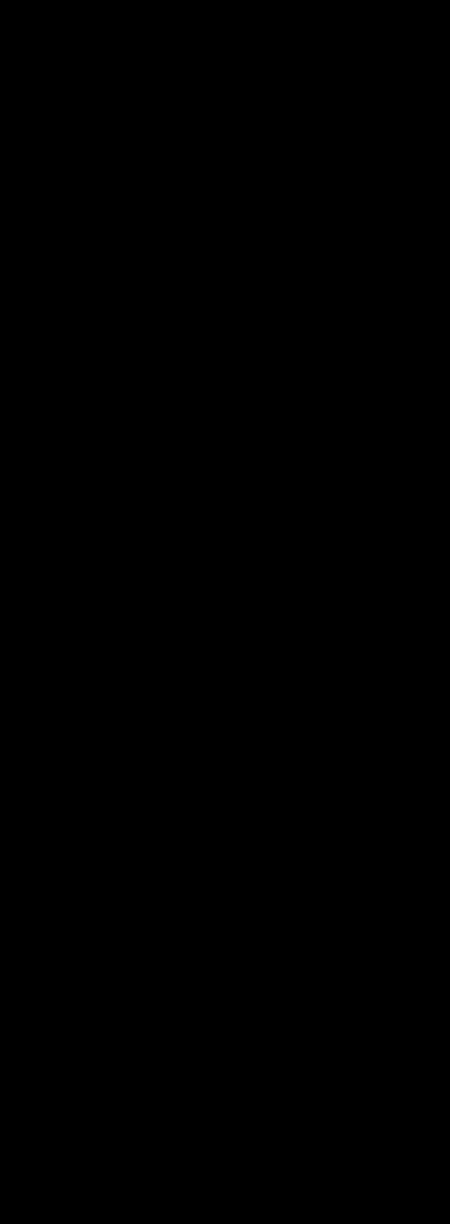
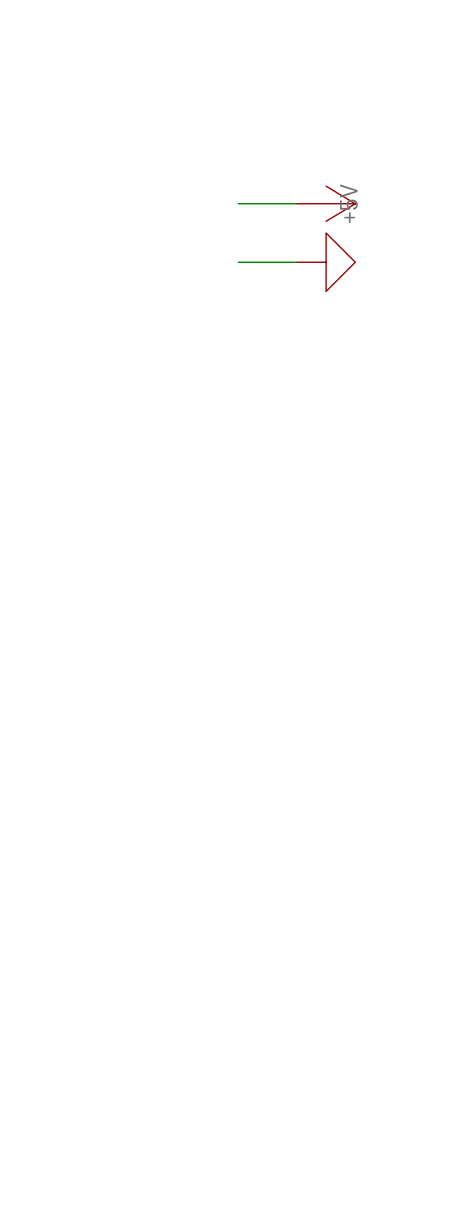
wire: none -> (238, 203) (296, 203)
power symbol: none -> +5V (326, 203)
wire: none -> (238, 262) (296, 262)
power symbol: none -> (326, 262)

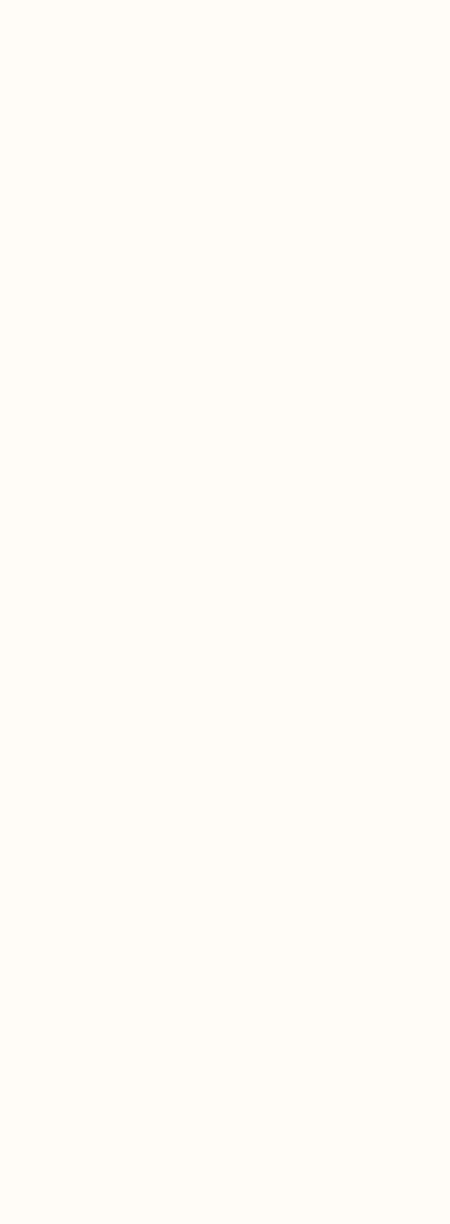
wire: (238, 203) (296, 203) -> none
power symbol: +5V (326, 203) -> none
wire: (238, 262) (296, 262) -> none
power symbol: (326, 262) -> none

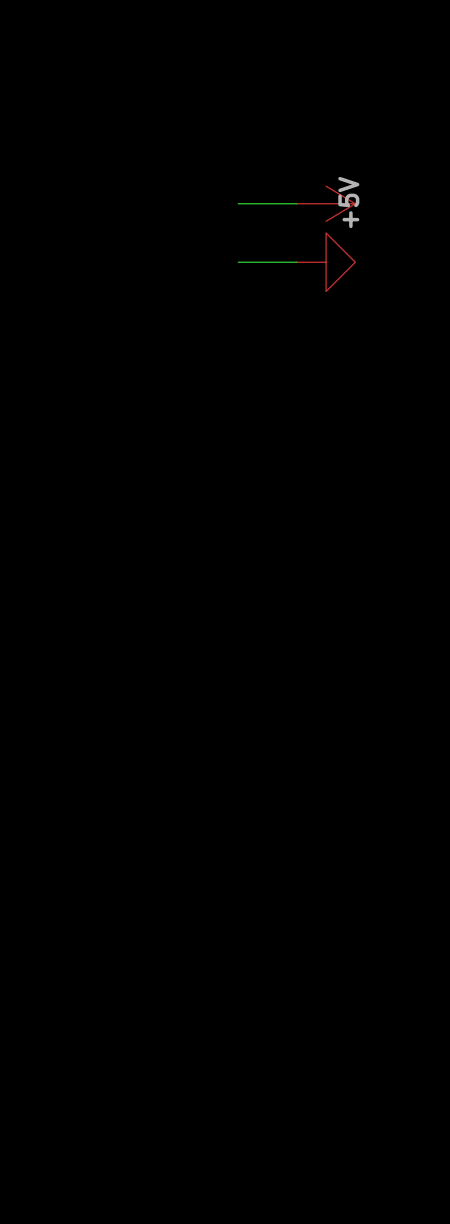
wire: none -> (238, 203) (296, 203)
power symbol: none -> +5V (326, 203)
wire: none -> (238, 262) (296, 262)
power symbol: none -> (326, 262)

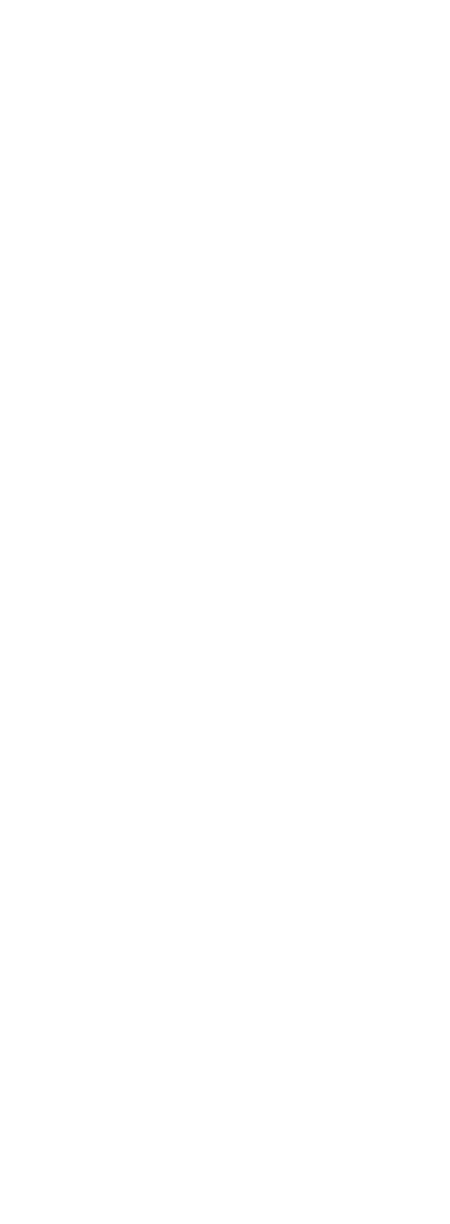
wire: (238, 203) (296, 203) -> none
power symbol: +5V (326, 203) -> none
wire: (238, 262) (296, 262) -> none
power symbol: (326, 262) -> none

